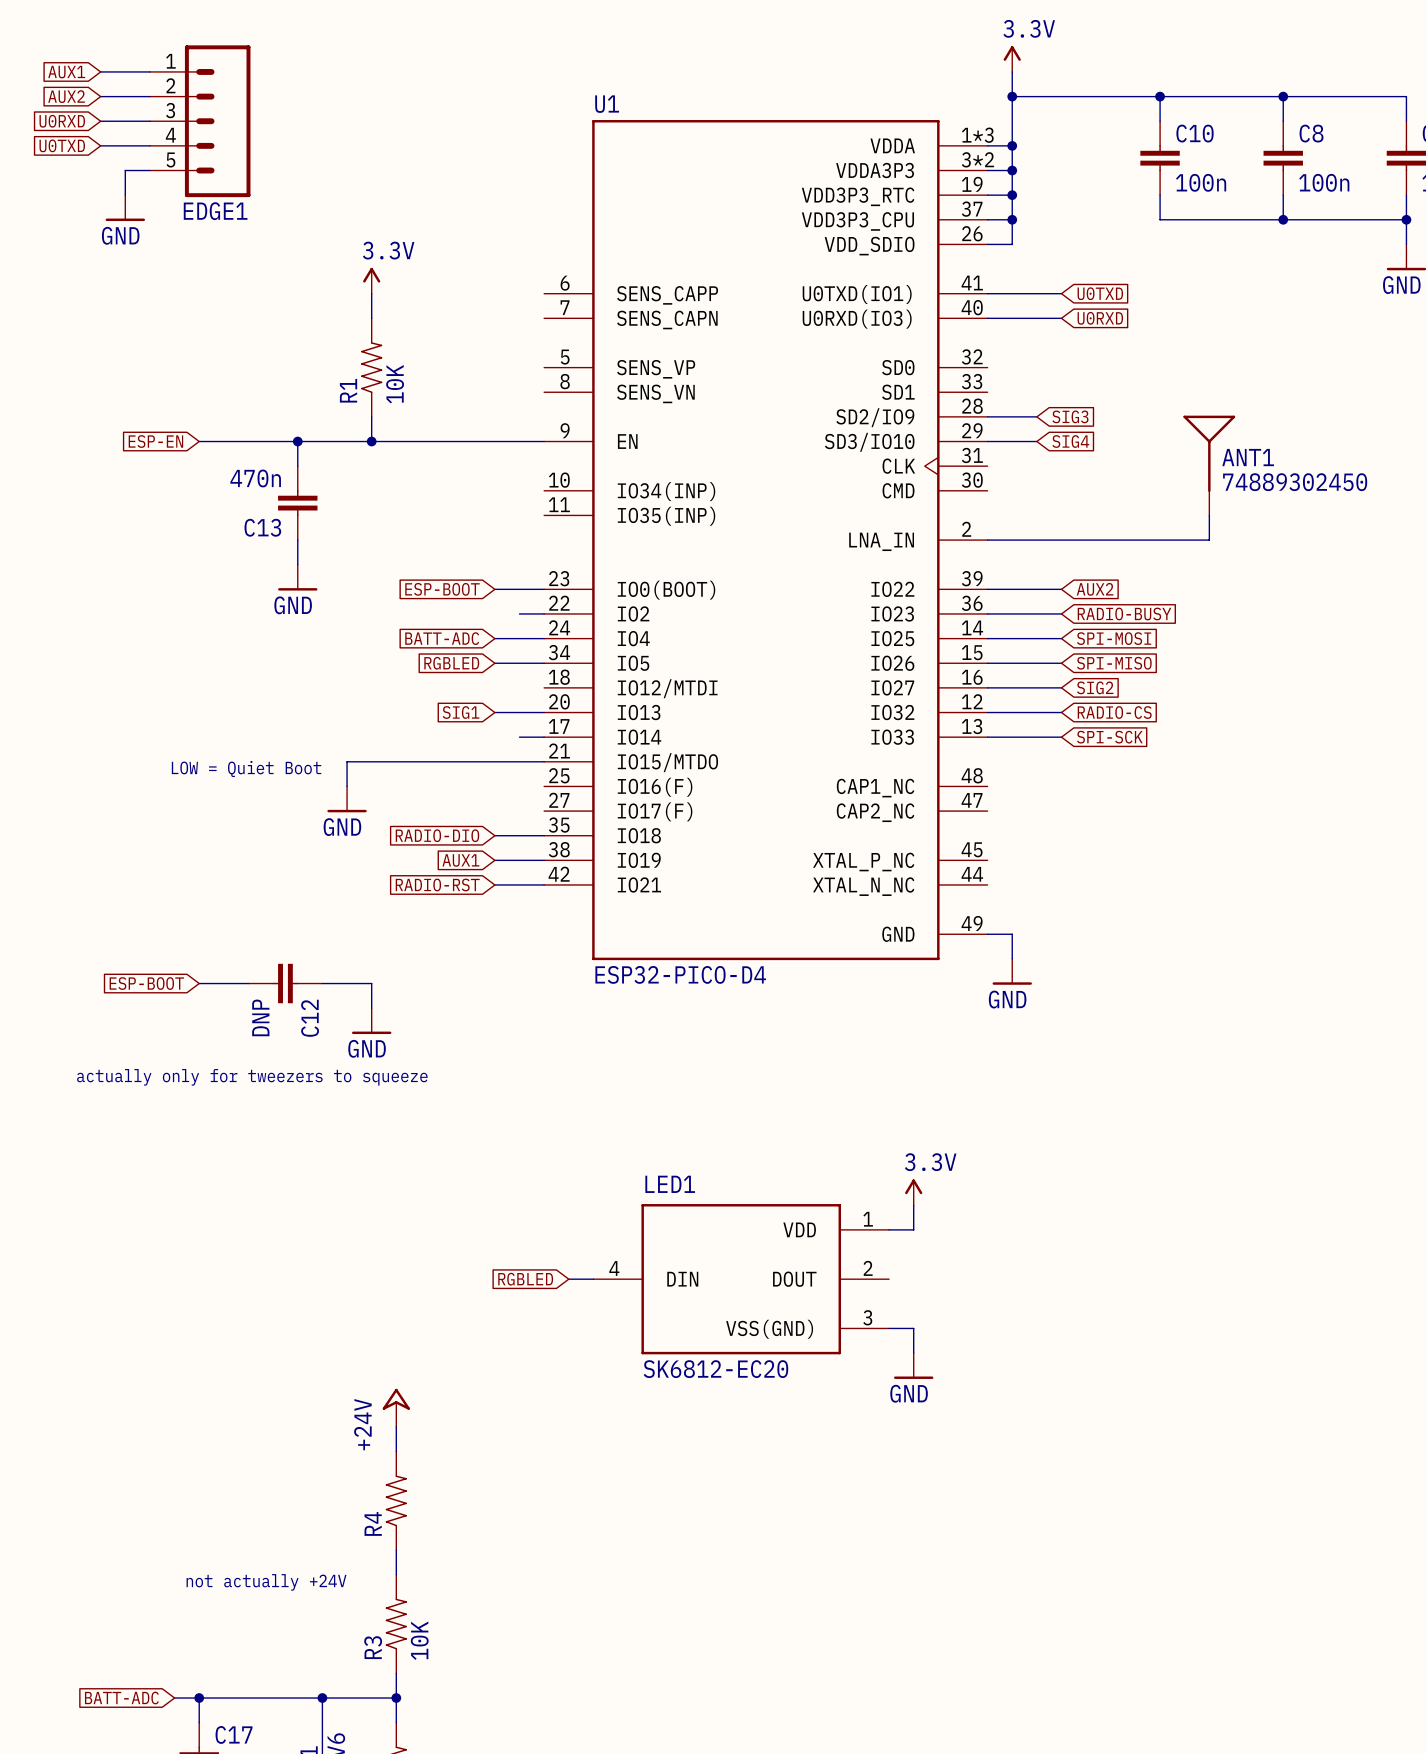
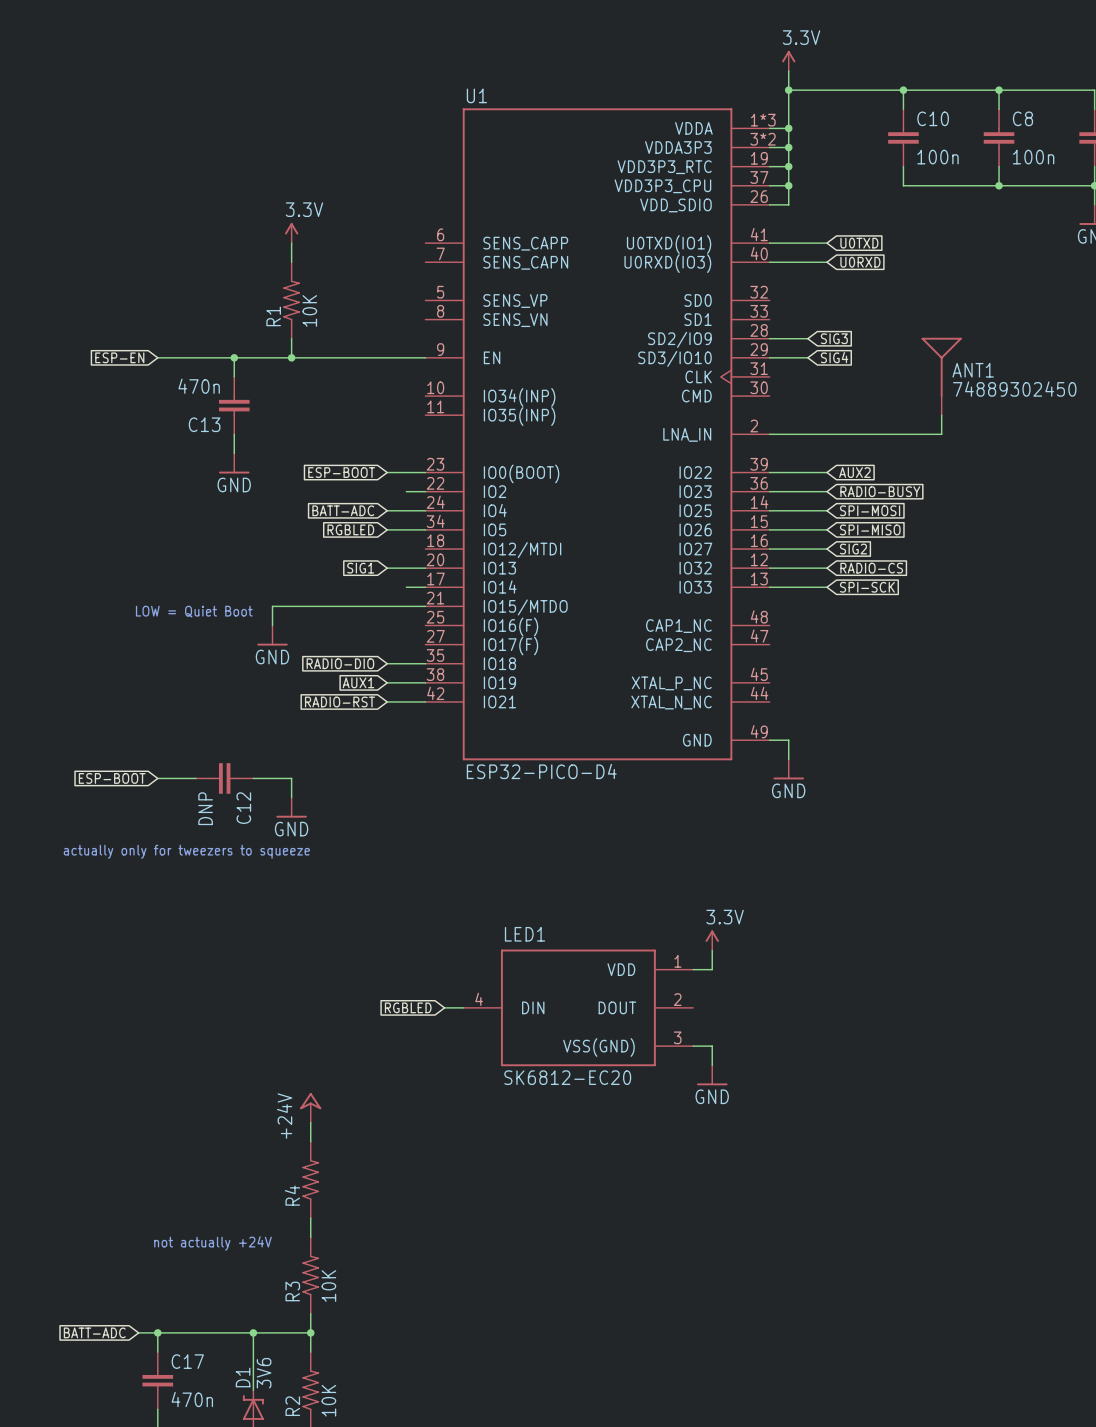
wire: (100, 71) (149, 71) -> none
global label: AUX1 (66, 72) -> none
global label: AUX2 (66, 96) -> none
wire: (100, 96) (149, 96) -> none
global label: U0RXD (62, 121) -> none
wire: (100, 121) (149, 121) -> none
EDGE1: (200, 121) -> none
global label: U0TXD (62, 145) -> none
wire: (100, 145) (149, 145) -> none
wire: (149, 170) (125, 170) (125, 195) -> none
power symbol: GND (125, 208) -> none

